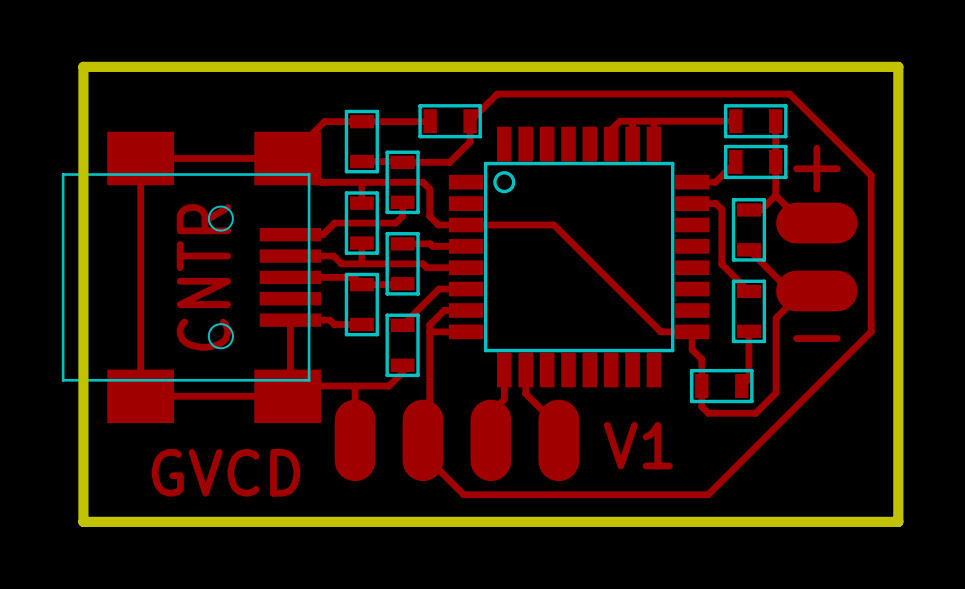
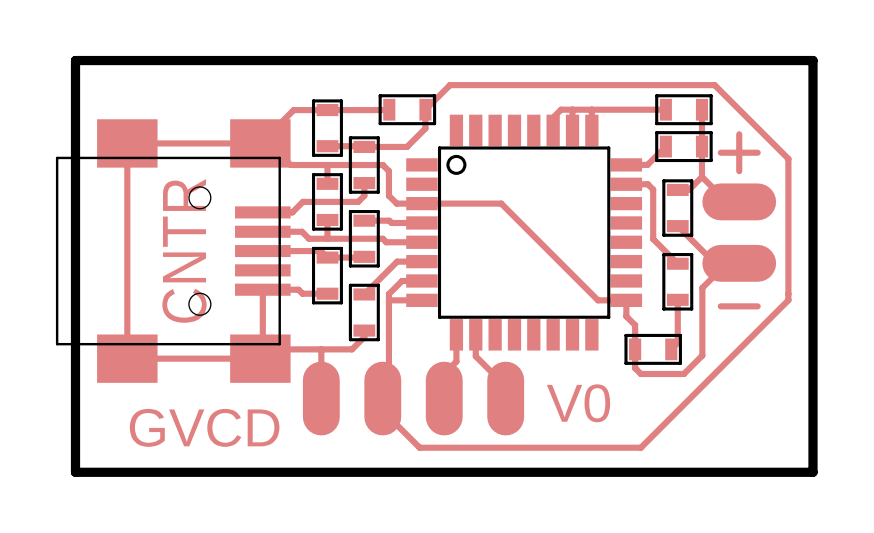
text: V1 (638, 445) -> V0 (578, 403)

